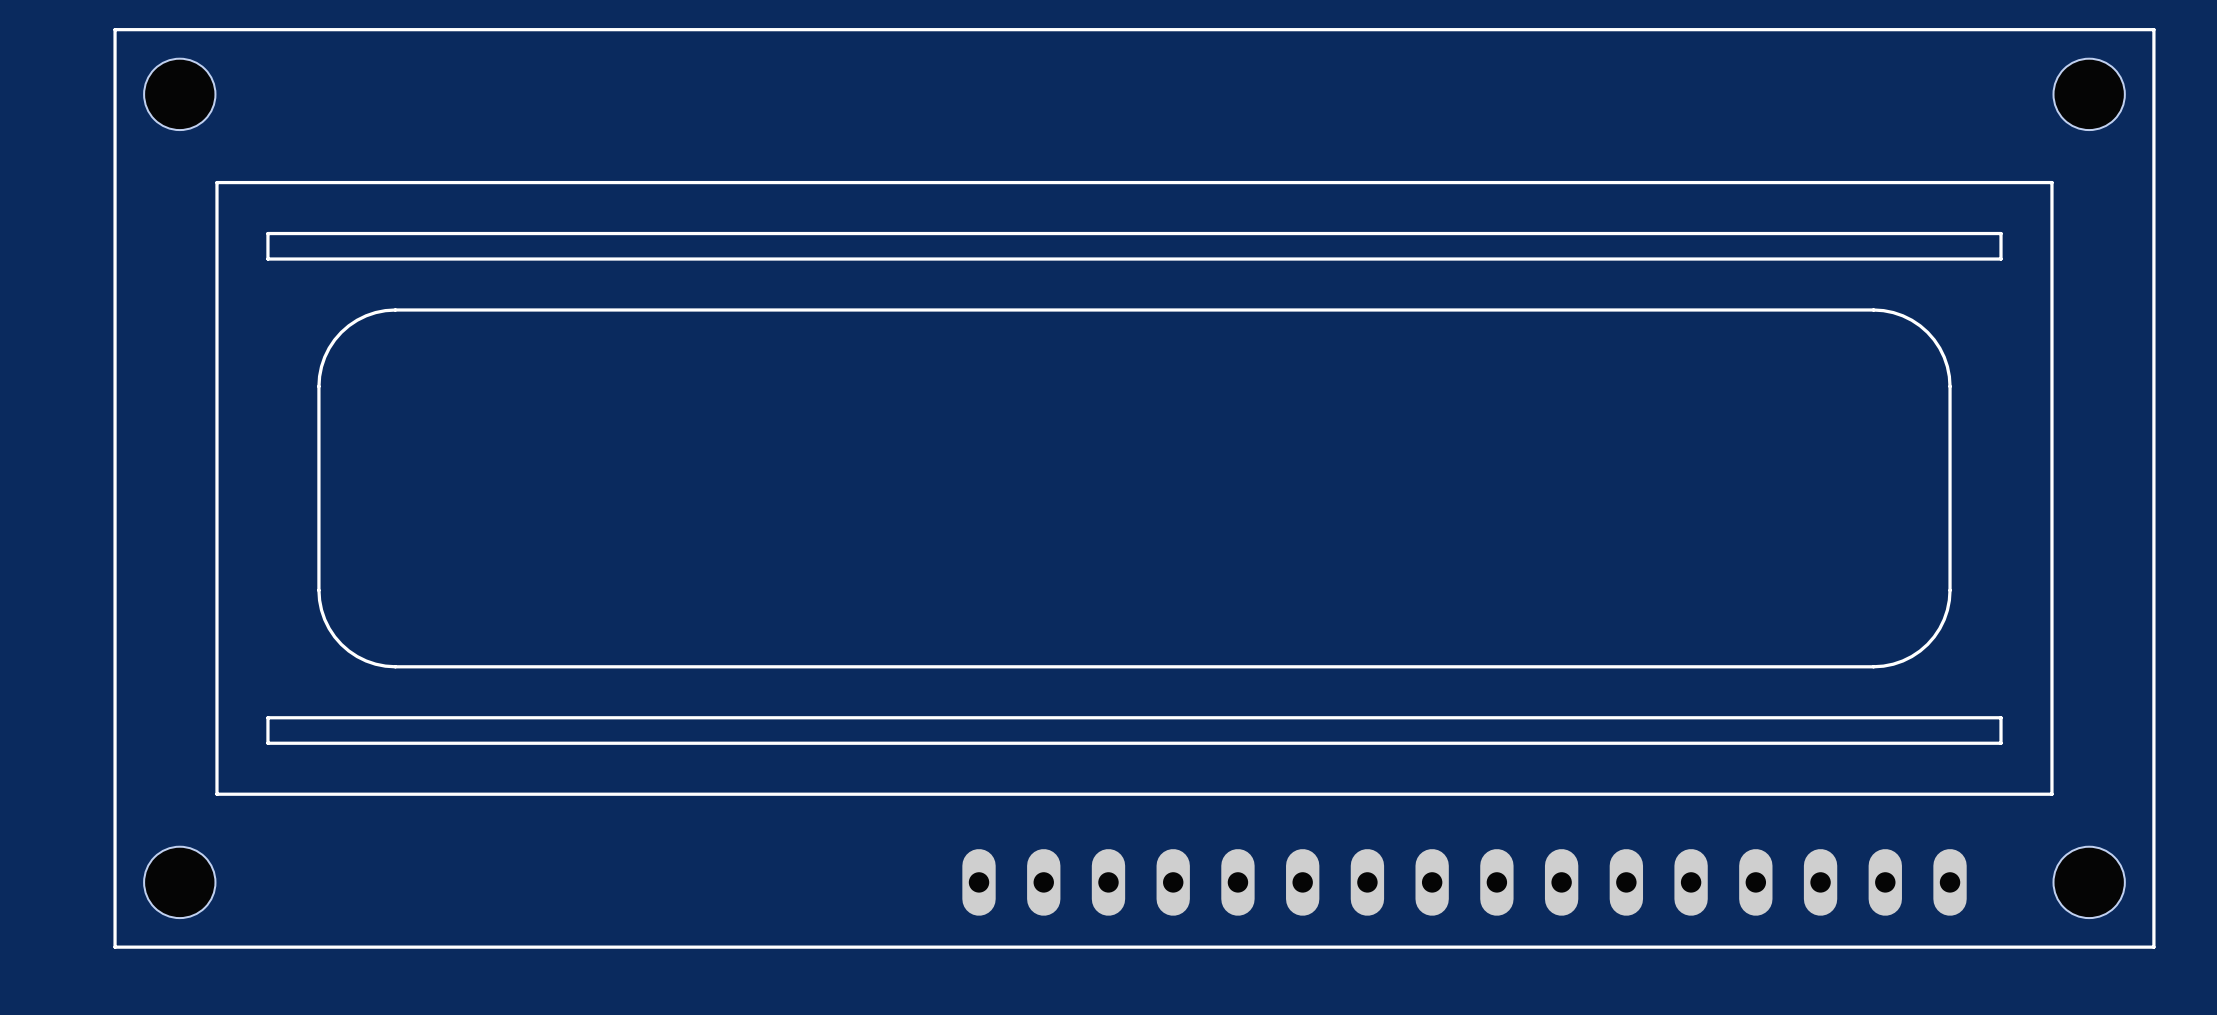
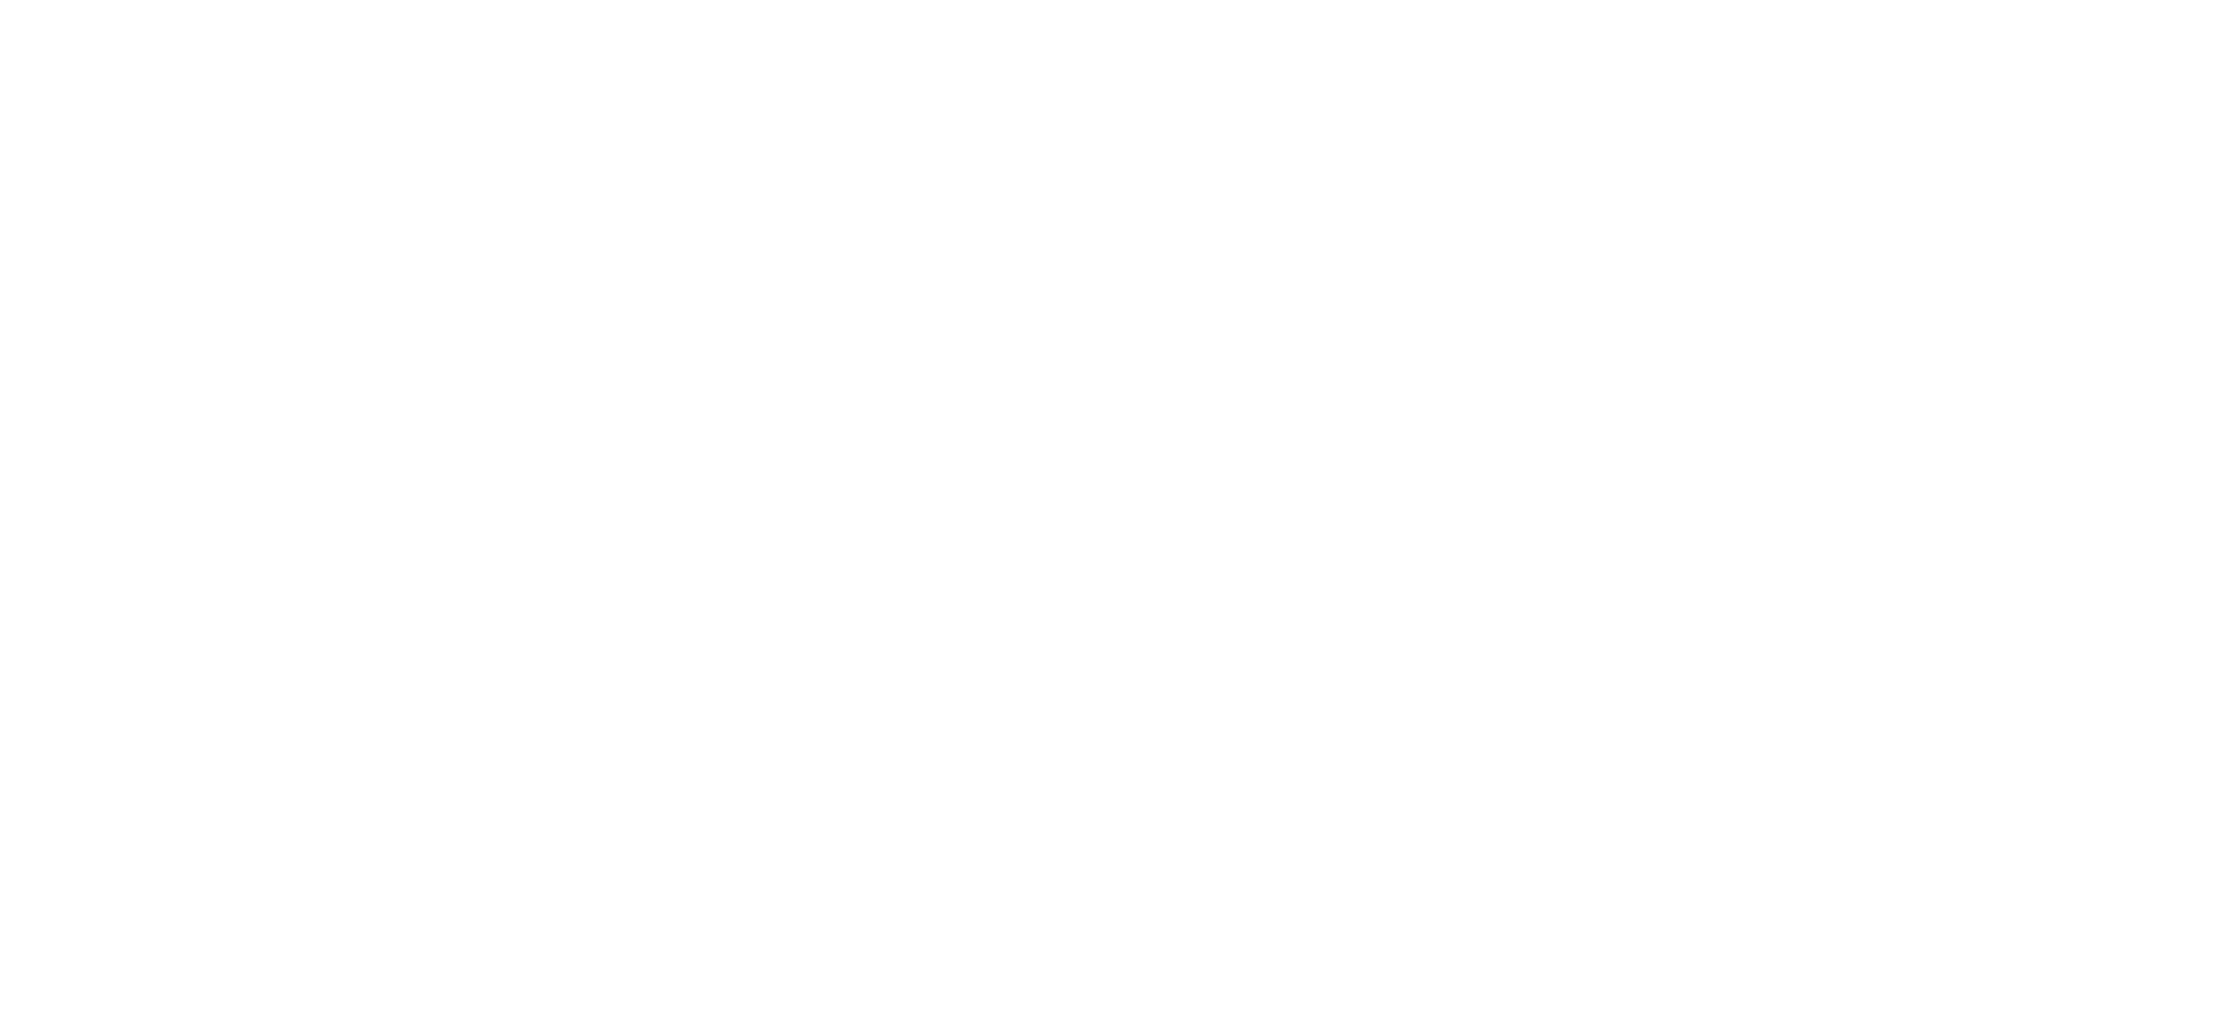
part: (1134, 488) -> none

